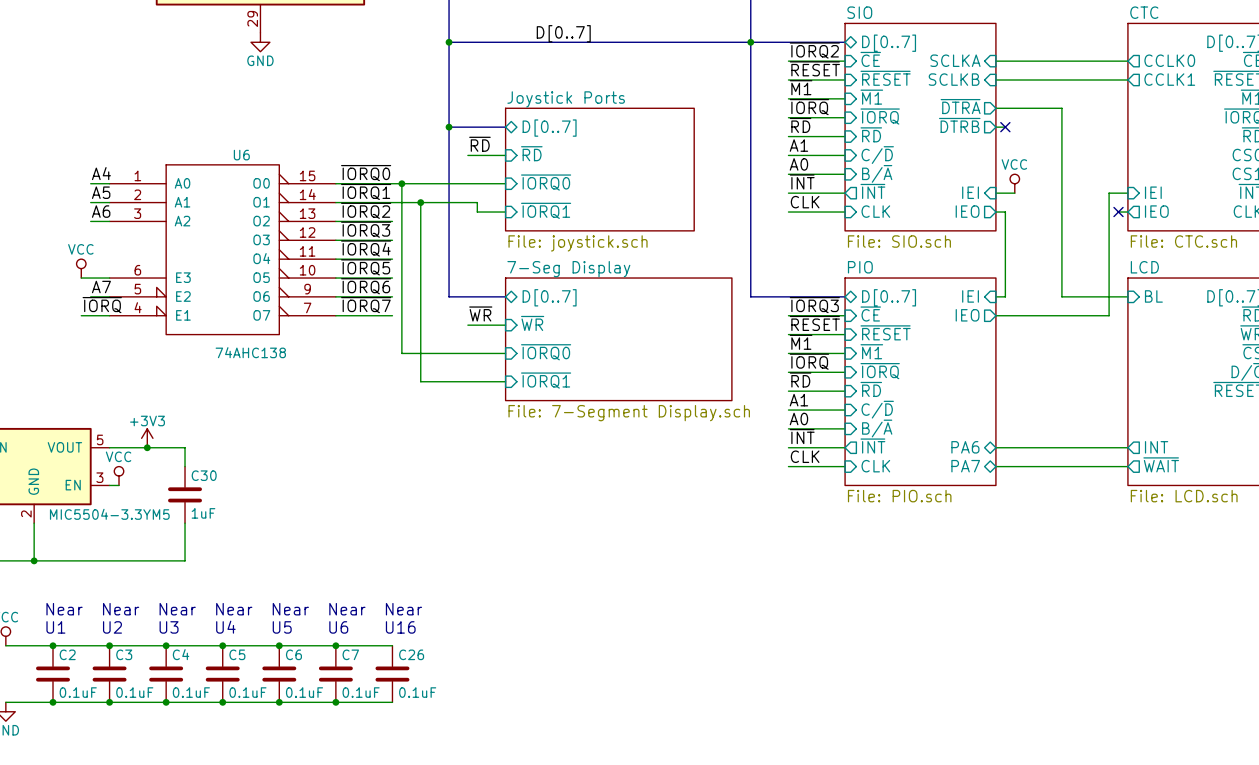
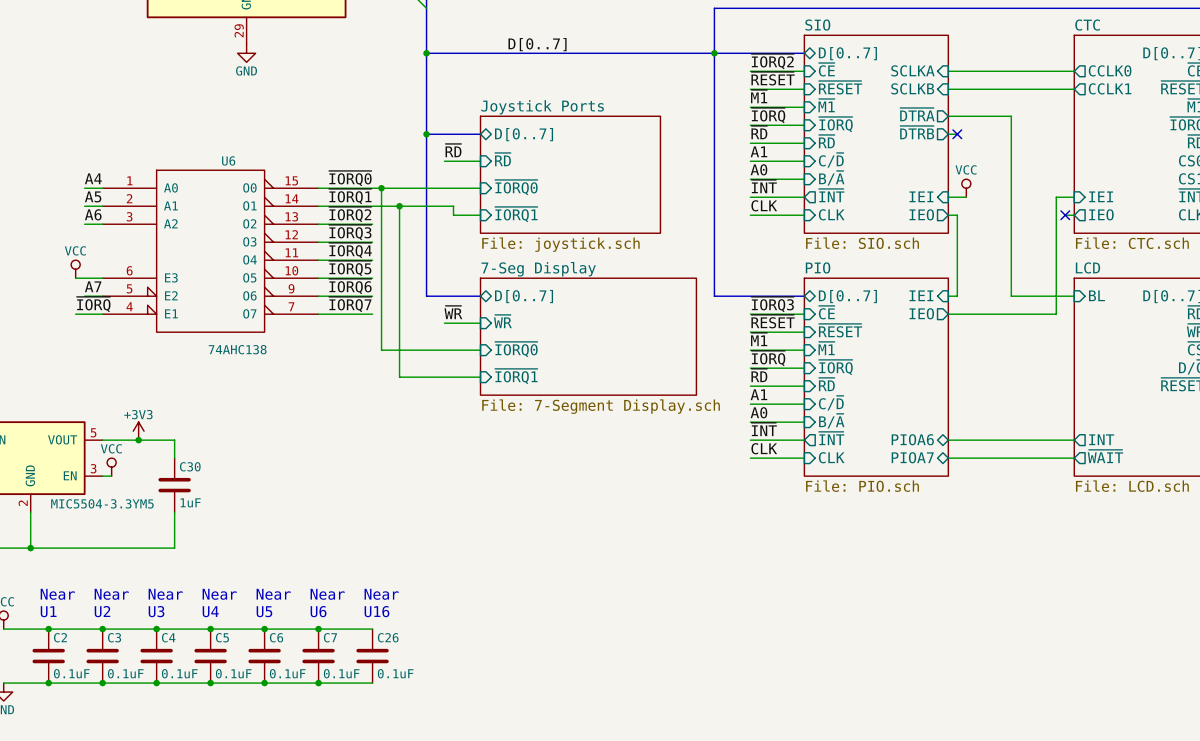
sheet pin: PA6 (965, 447) -> PIOA6 (912, 439)
sheet pin: PA7 (965, 466) -> PIOA7 (912, 457)

